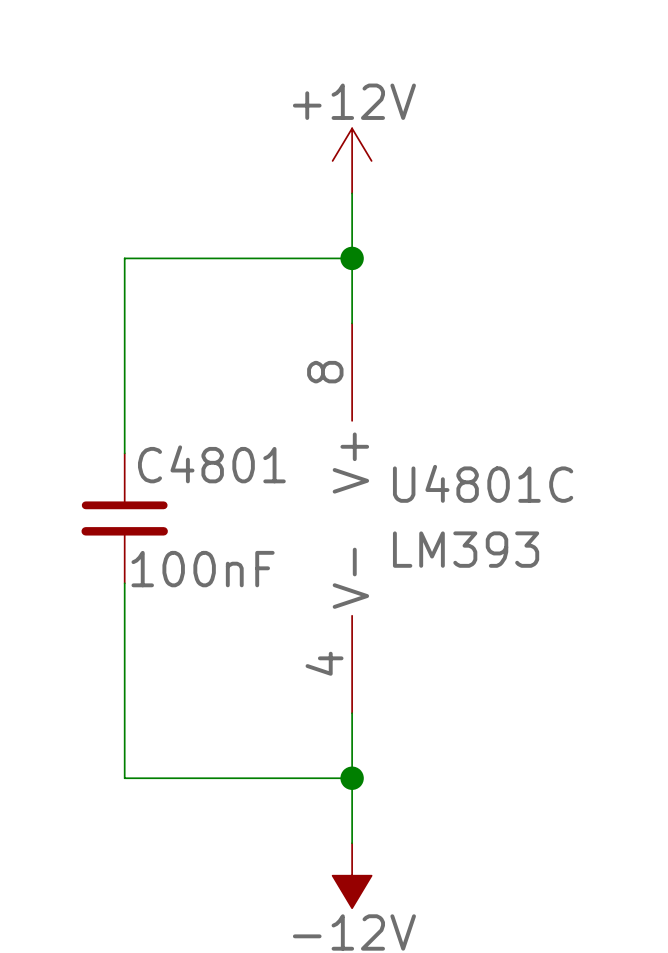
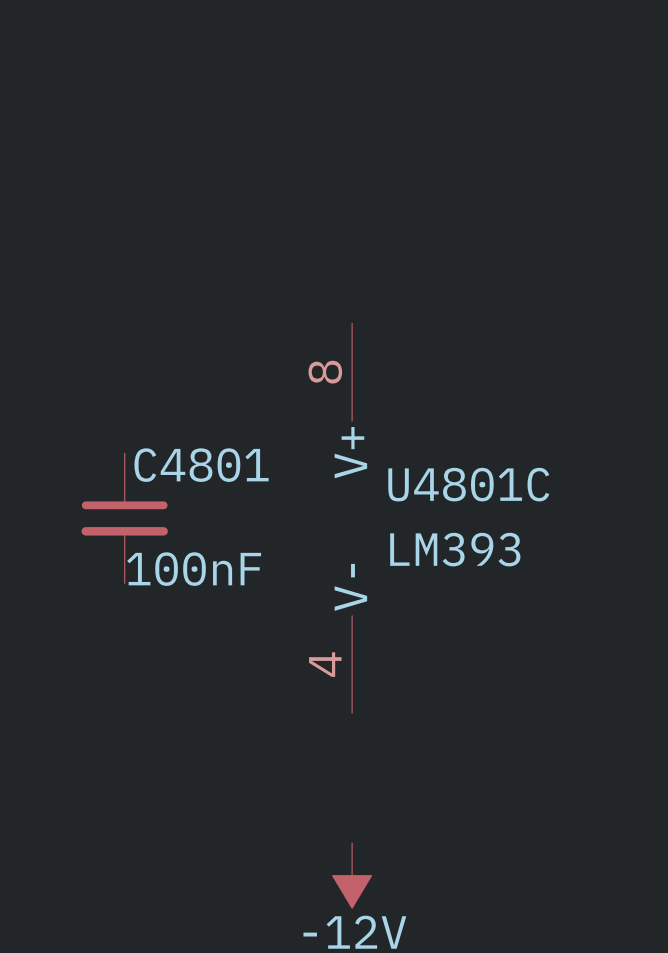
power symbol: +12V (352, 160) -> none
wire: (352, 193) (352, 323) -> none
wire: (352, 258) (124, 258) (124, 453) -> none
junction: (352, 258) -> none
wire: (124, 583) (124, 778) (352, 778) -> none
wire: (352, 713) (352, 843) -> none
junction: (352, 778) -> none

